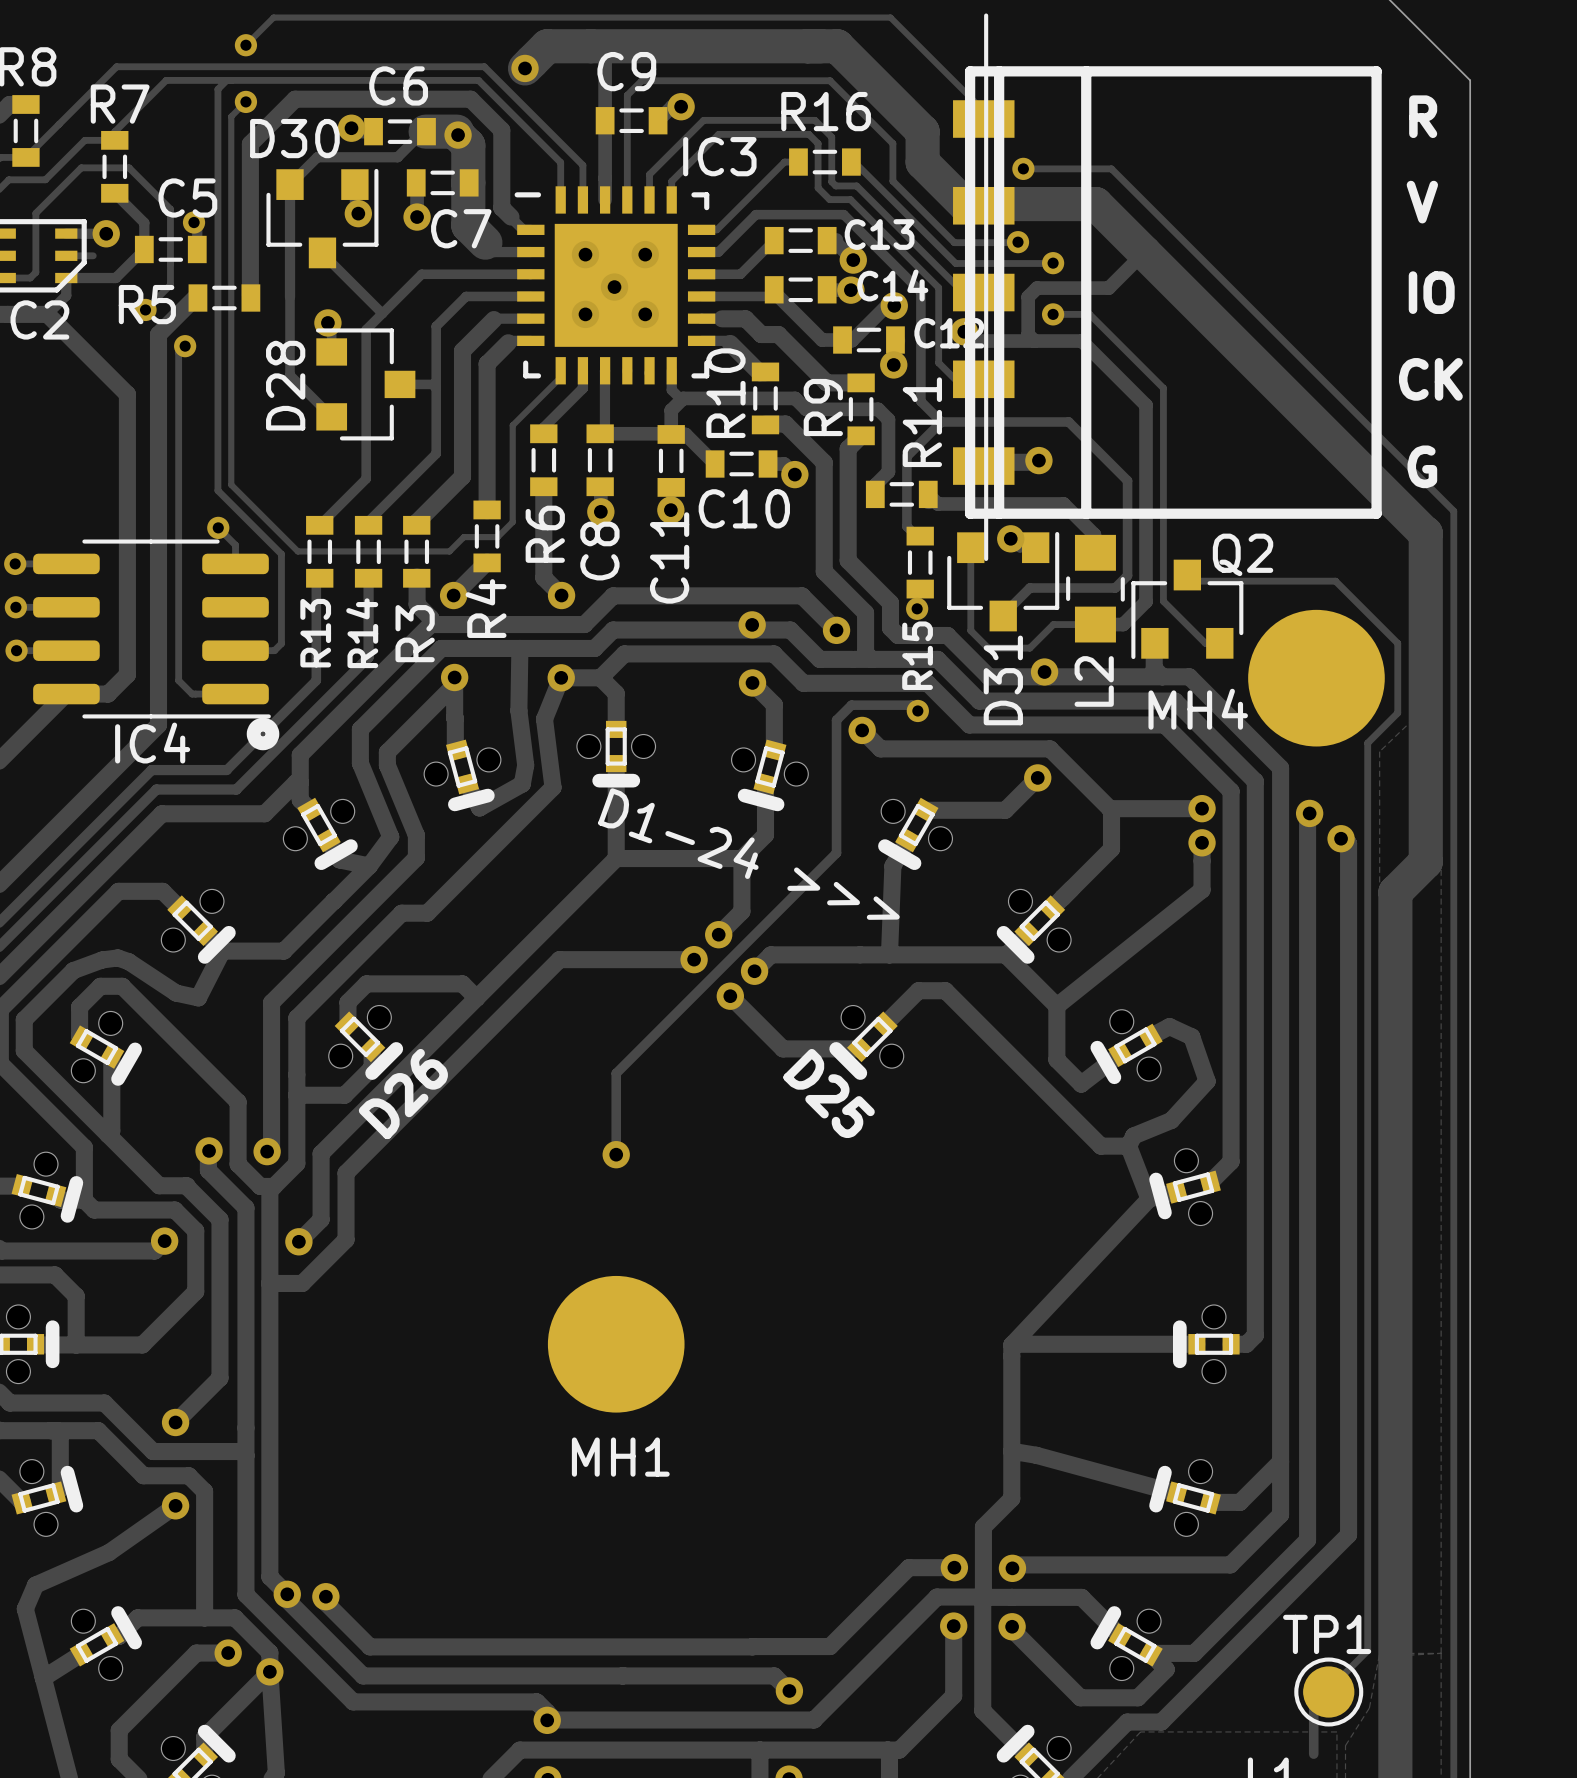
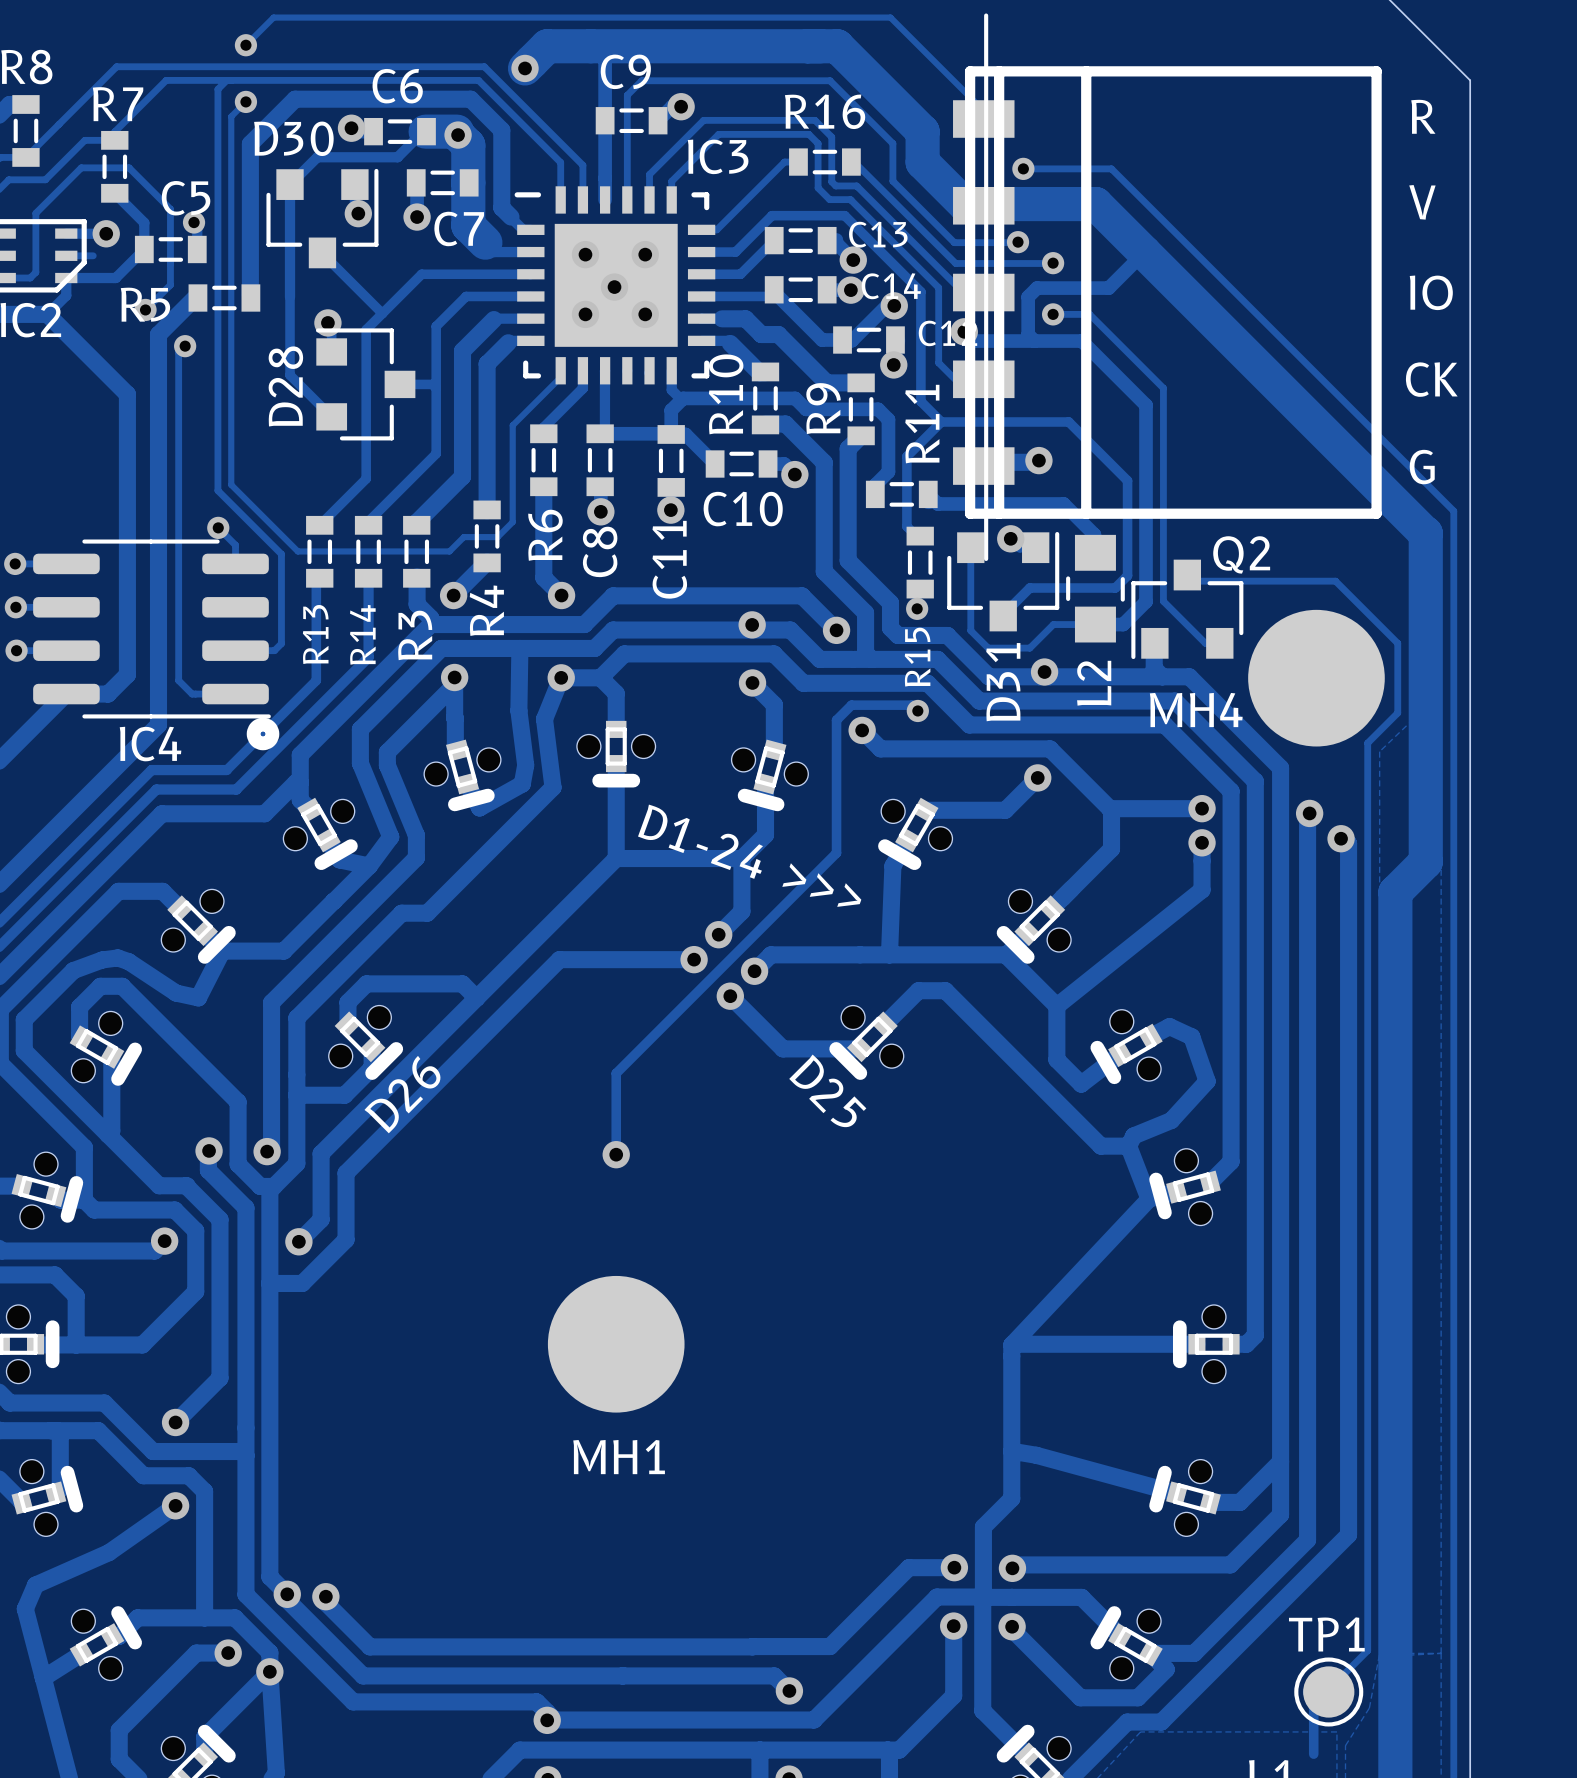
track: (844, 215) (755, 214) (718, 252) -> (844, 215) (771, 215) (735, 252) (718, 252)

